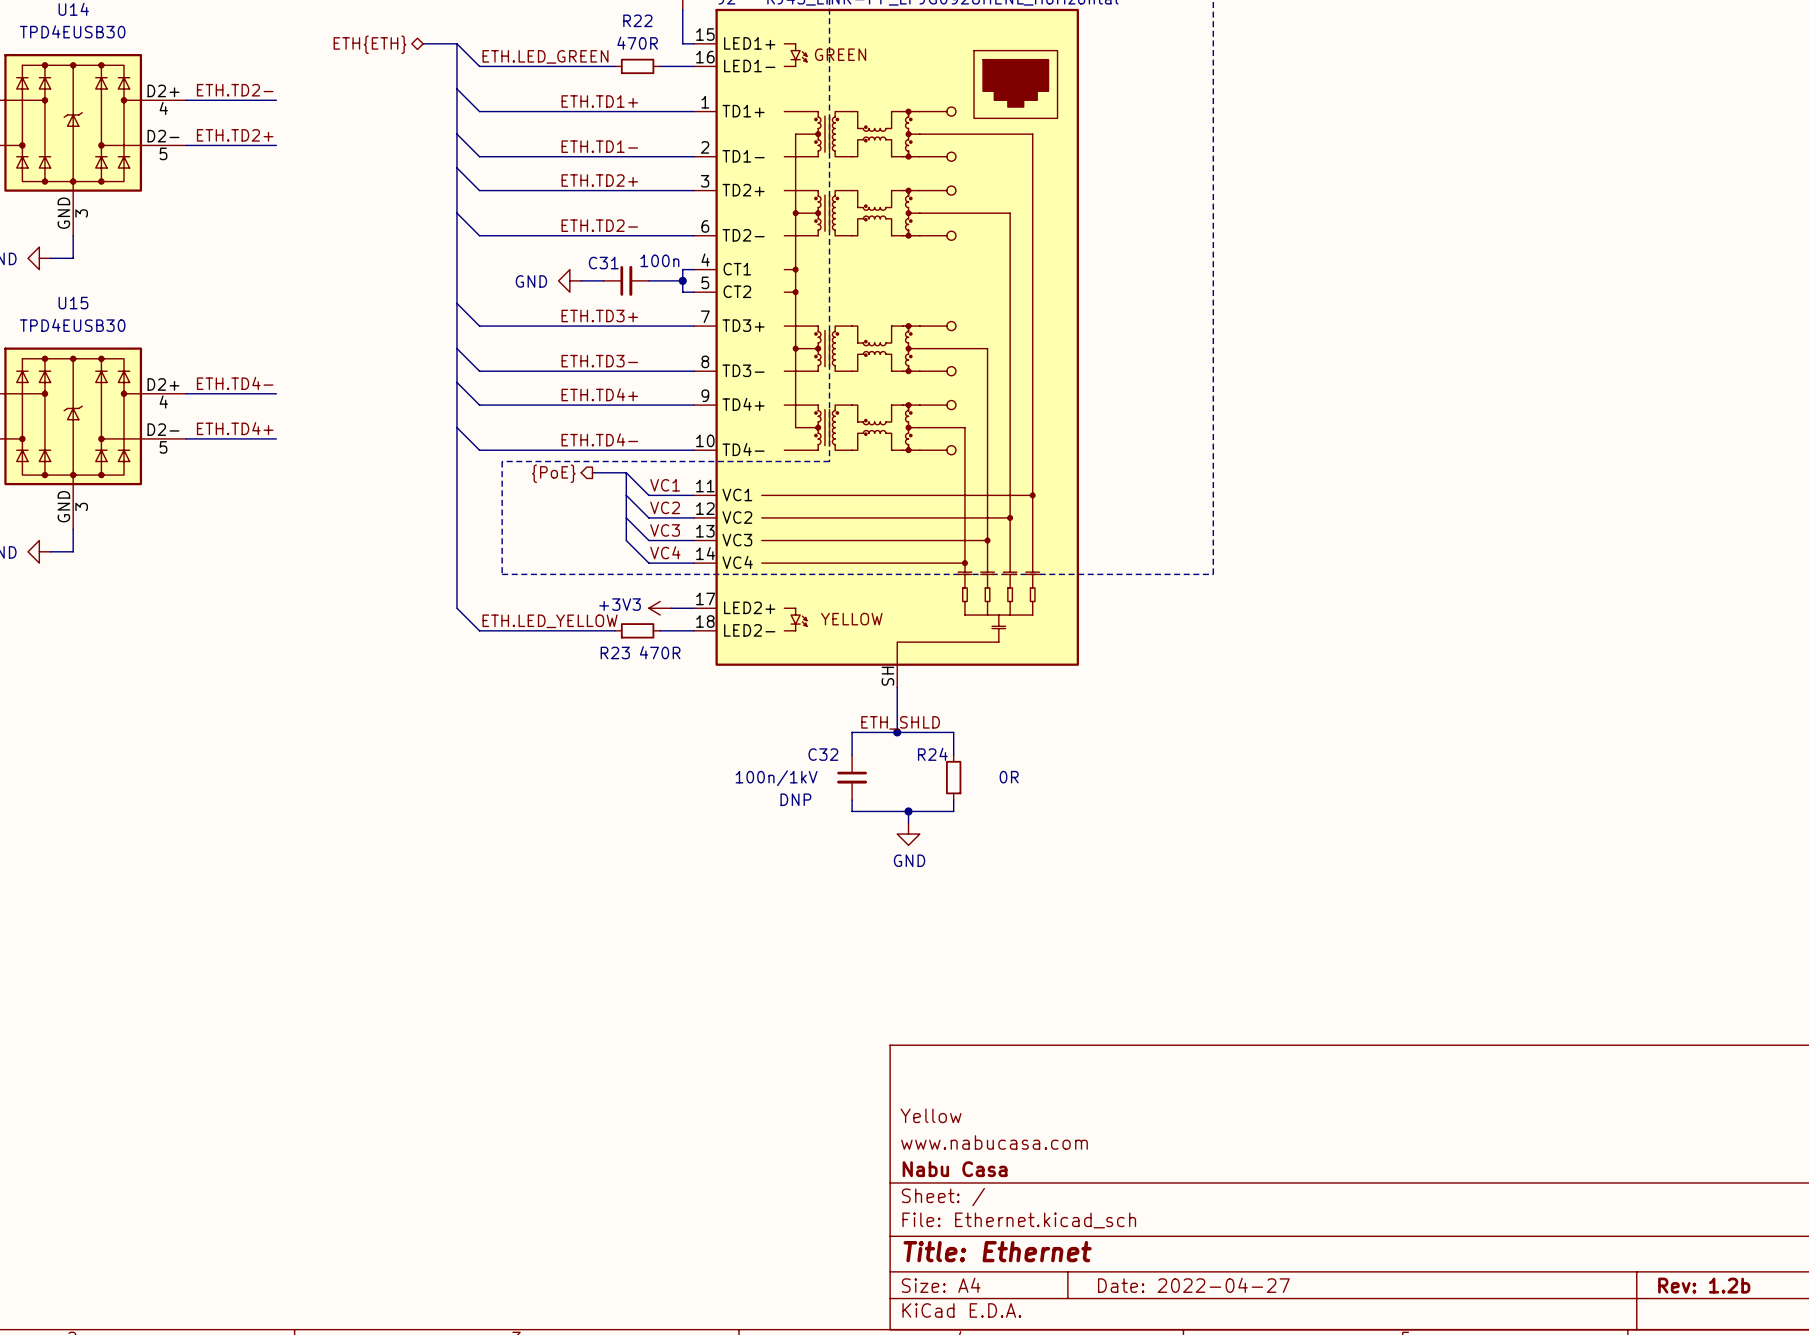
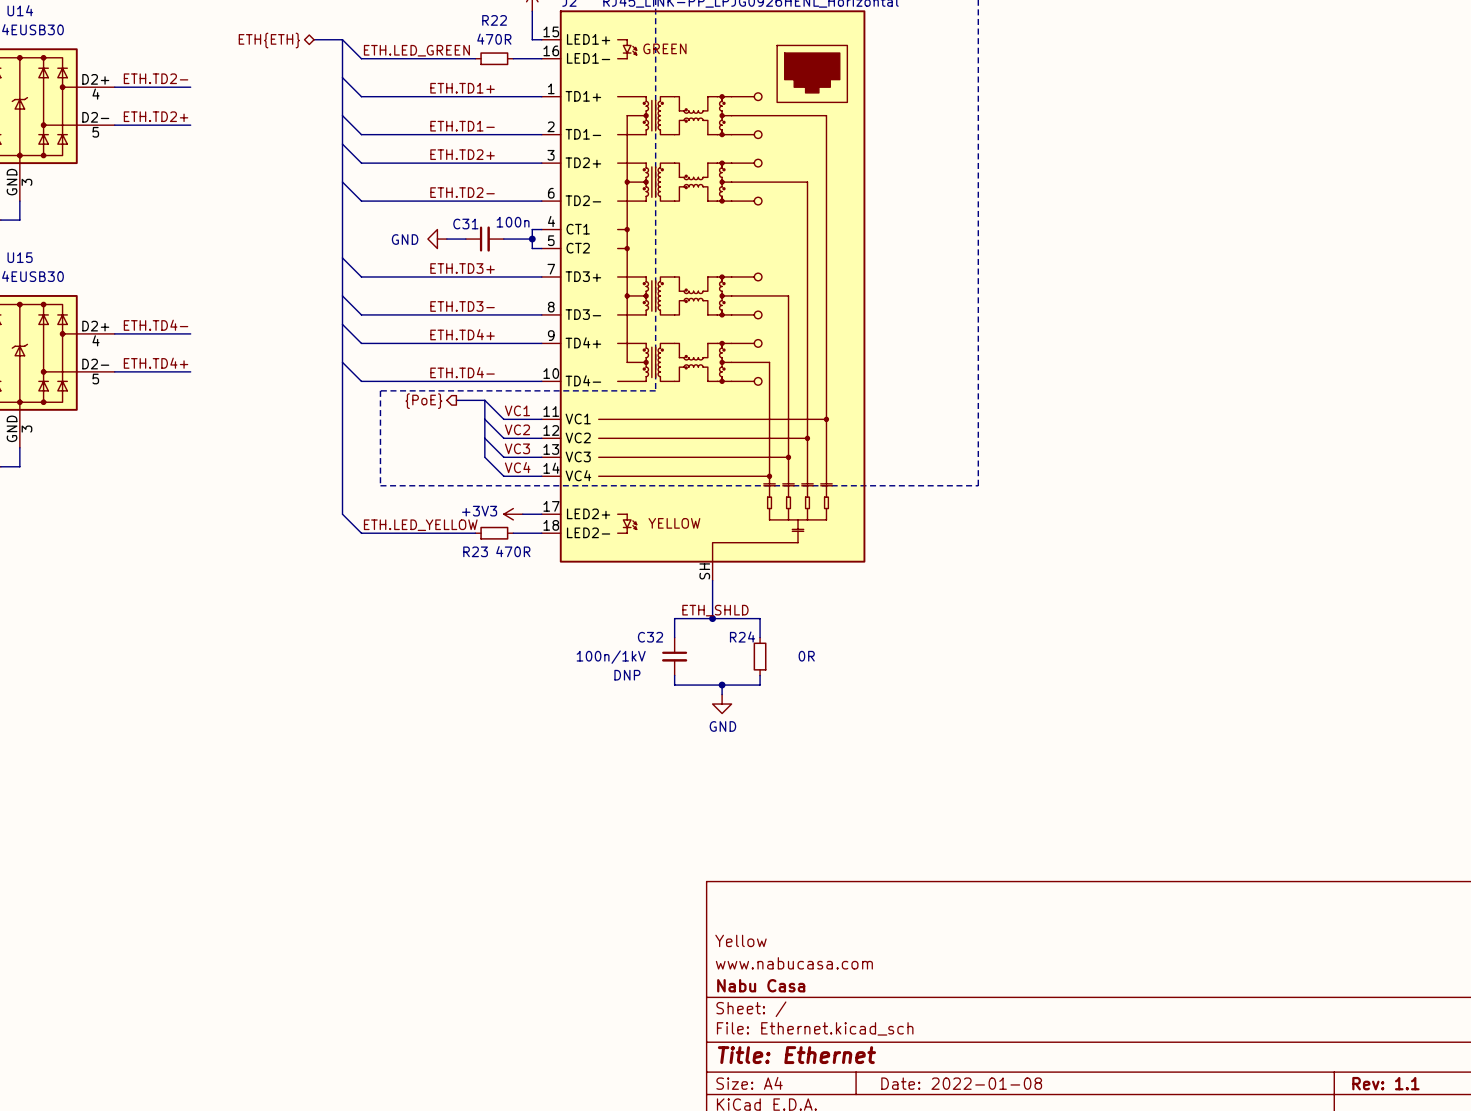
title block: Date: 2022-04-27 (1193, 1285) -> Date: 2022-01-08 (961, 1083)
title block: Rev: 1.2b (1704, 1285) -> Rev: 1.1 (1385, 1083)

